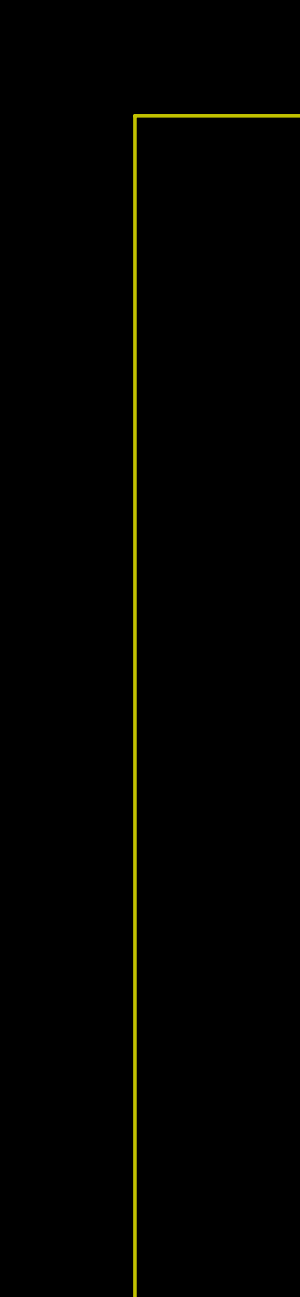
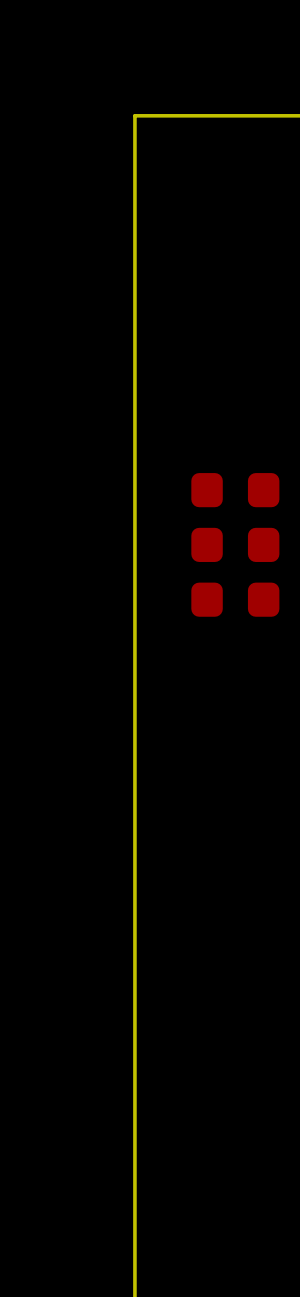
part: none -> (235, 490)
part: none -> (235, 544)
part: none -> (235, 599)

